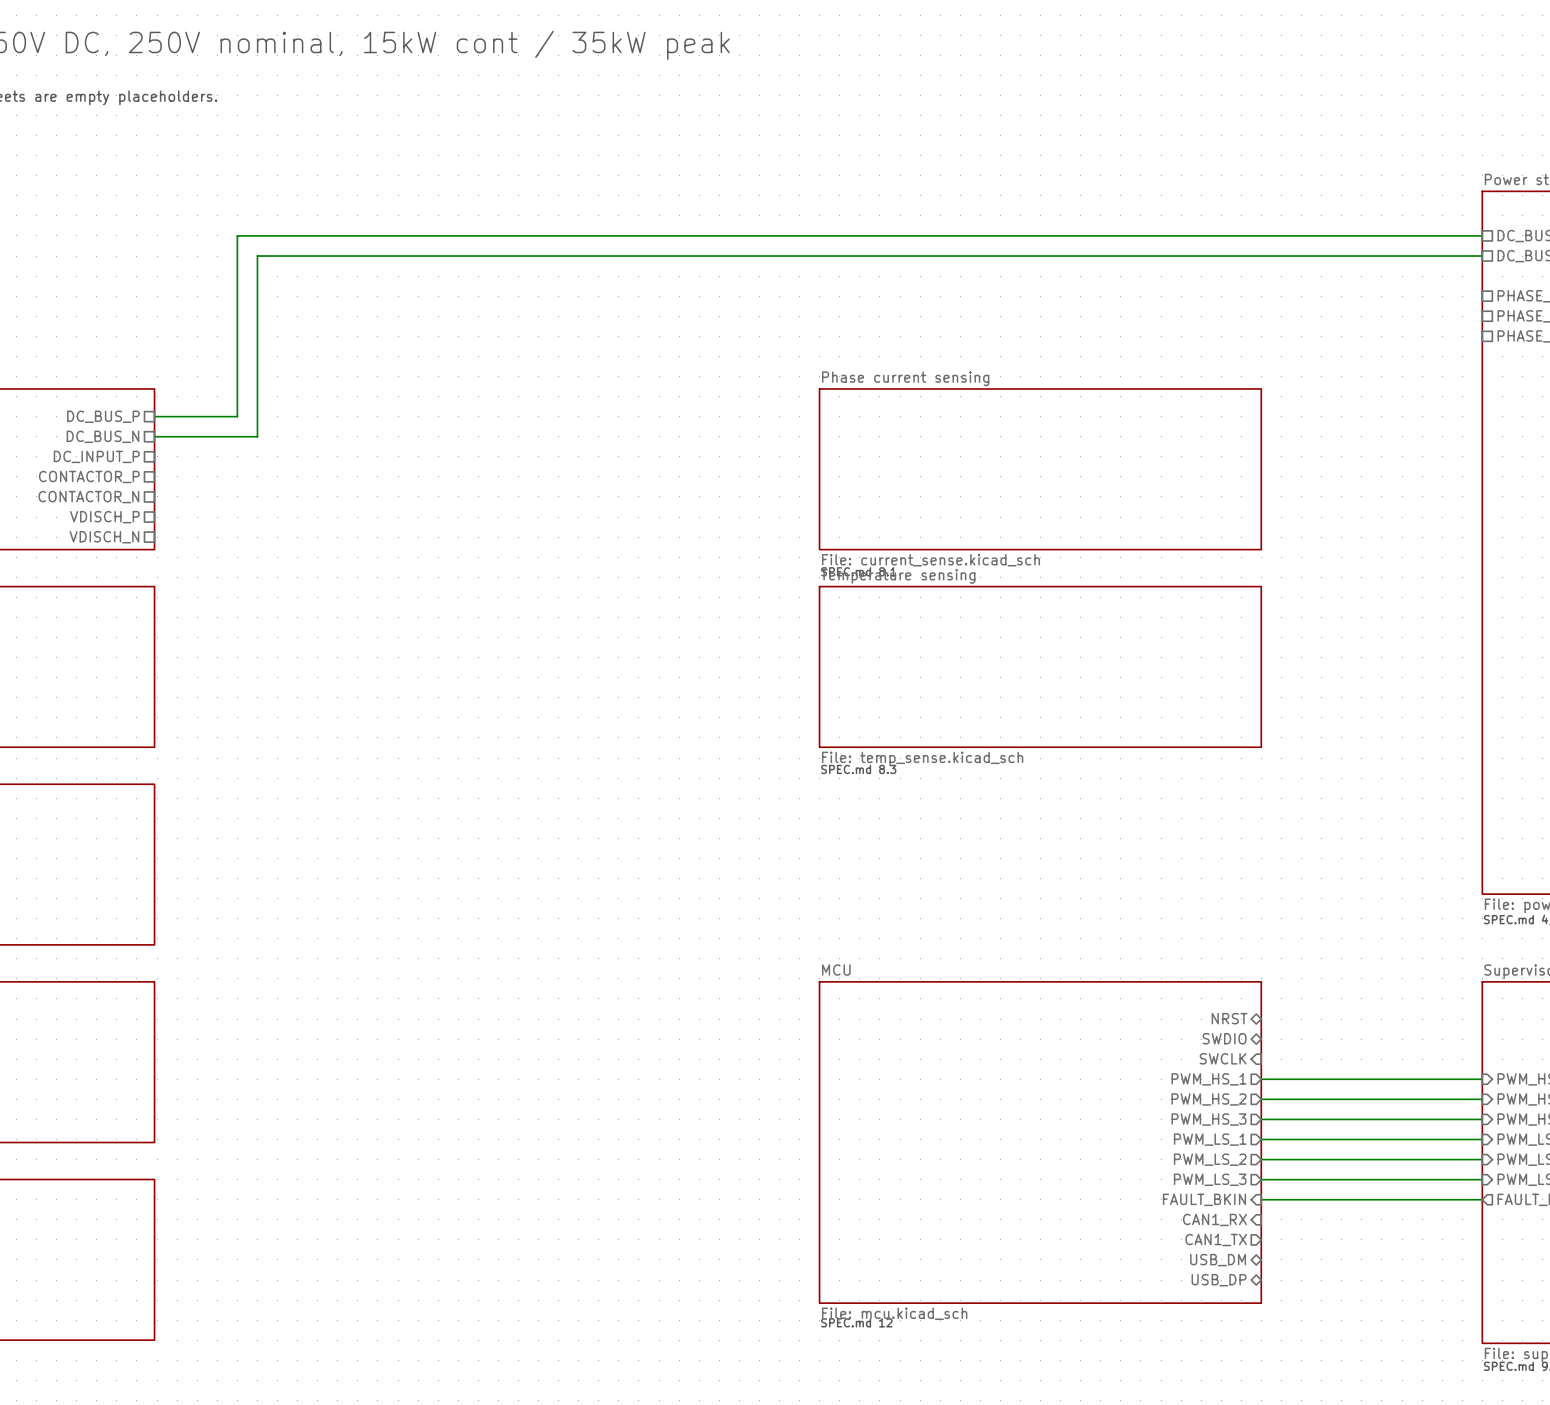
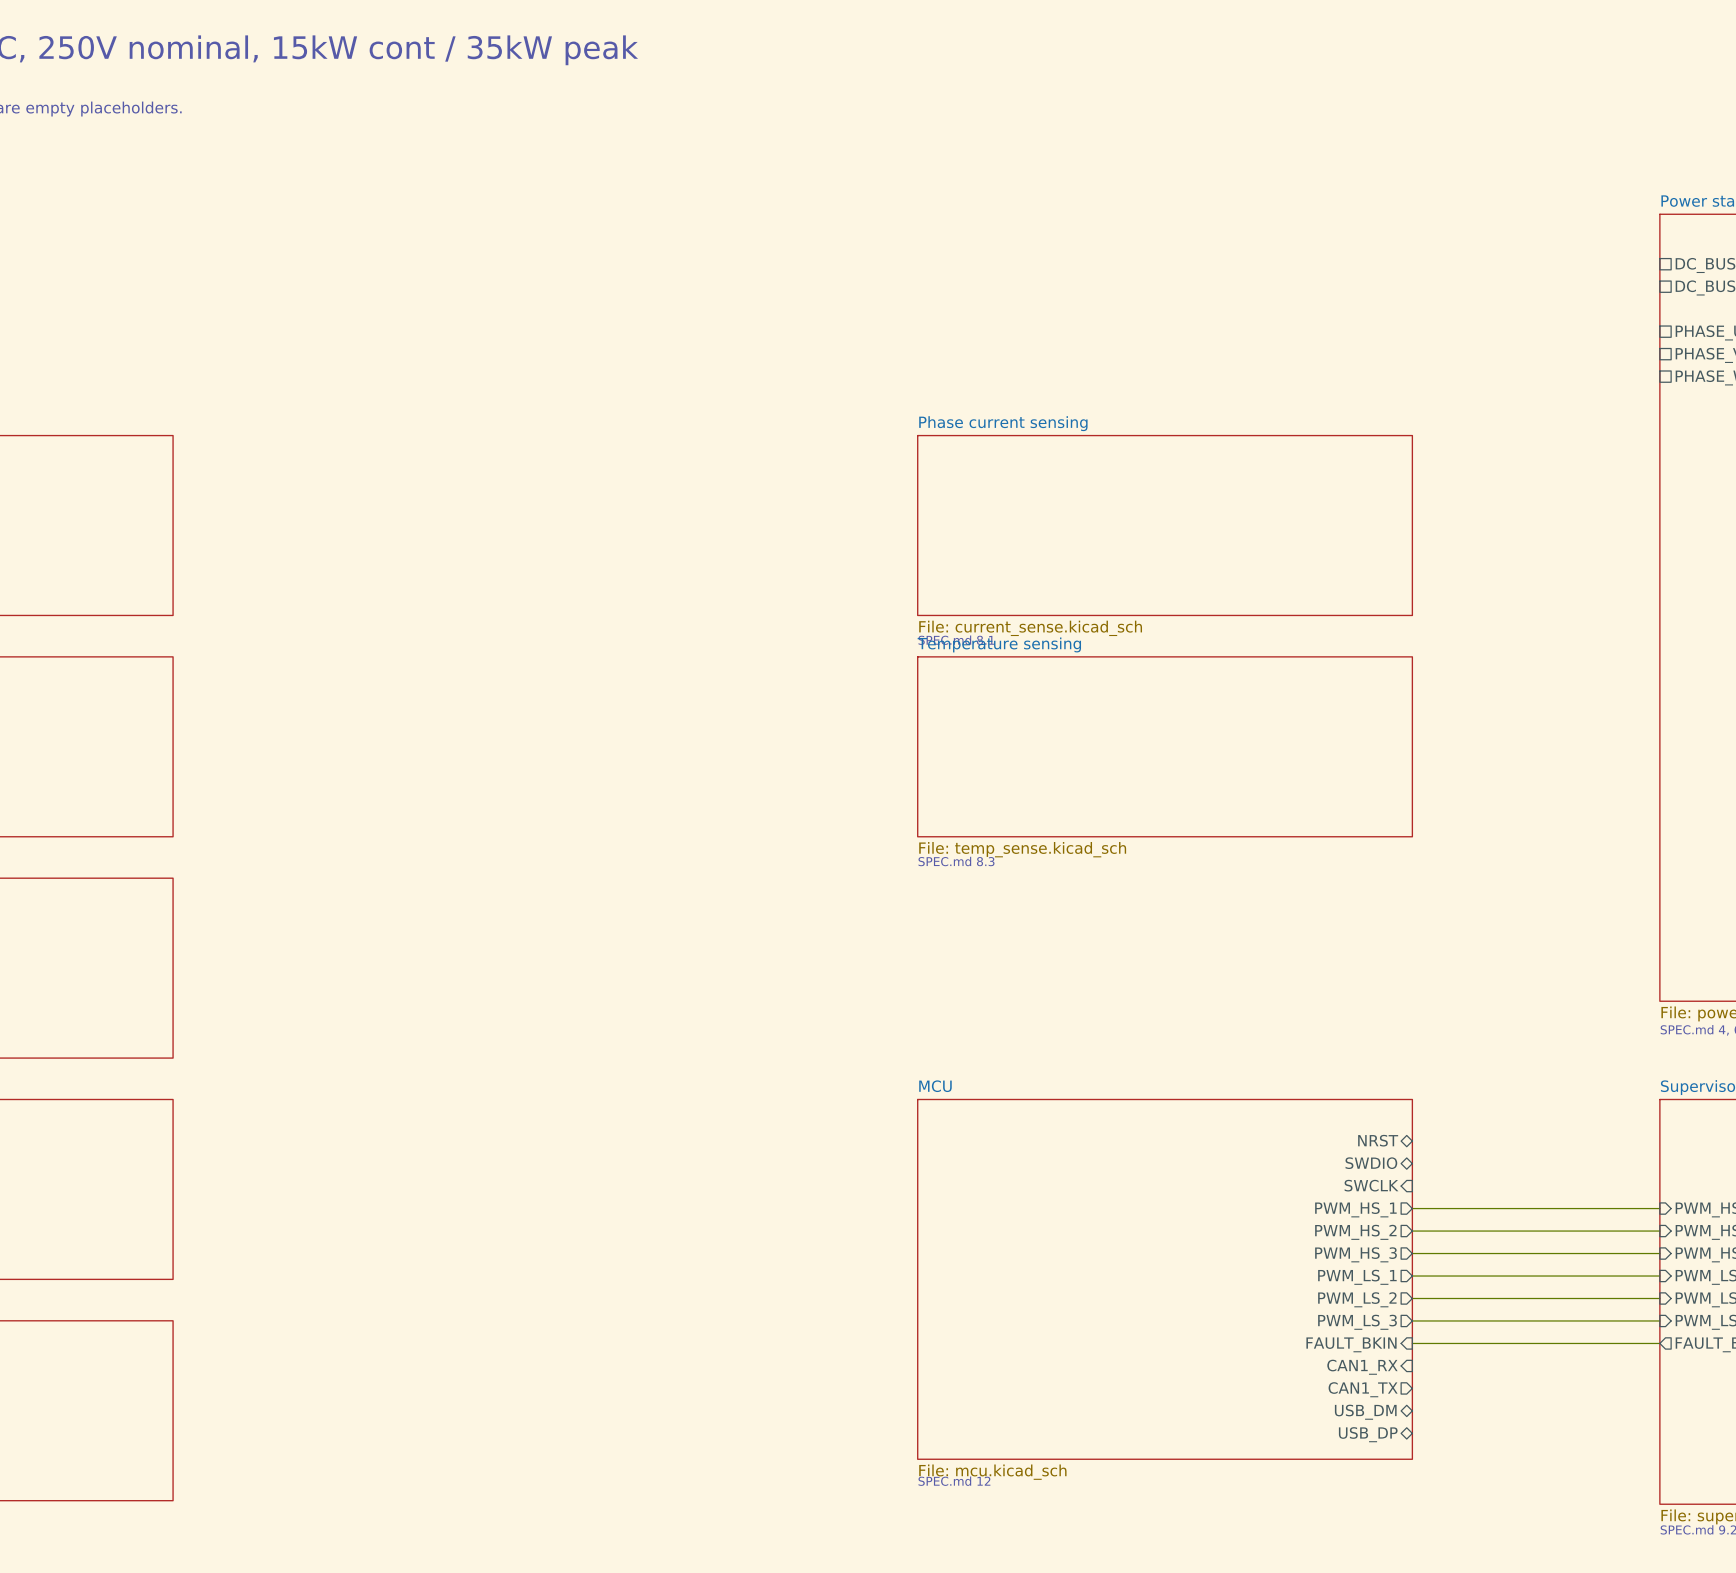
wire: (1482, 235) (237, 235) (237, 416) (154, 416) -> none
wire: (1482, 256) (257, 256) (257, 436) (154, 436) -> none
sheet pin: DC_BUS_P (103, 416) -> none
sheet pin: DC_BUS_N (102, 436) -> none
sheet pin: DC_INPUT_P (96, 456) -> none
sheet pin: CONTACTOR_P (89, 476) -> none
sheet pin: CONTACTOR_N (88, 497) -> none
sheet pin: VDISCH_P (104, 517) -> none
sheet pin: VDISCH_N (104, 537) -> none

